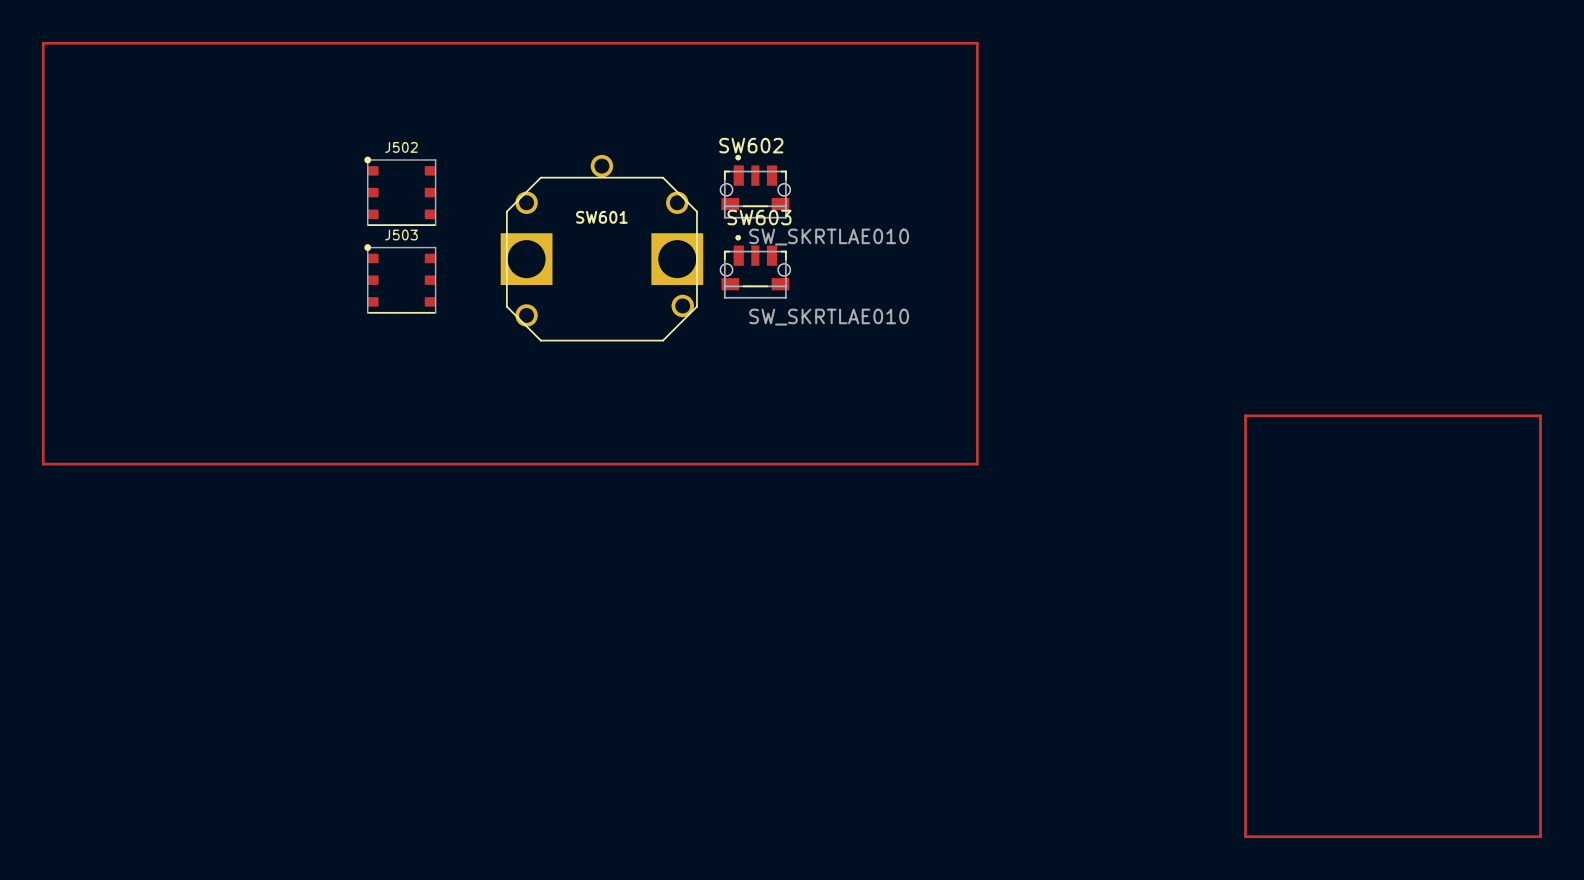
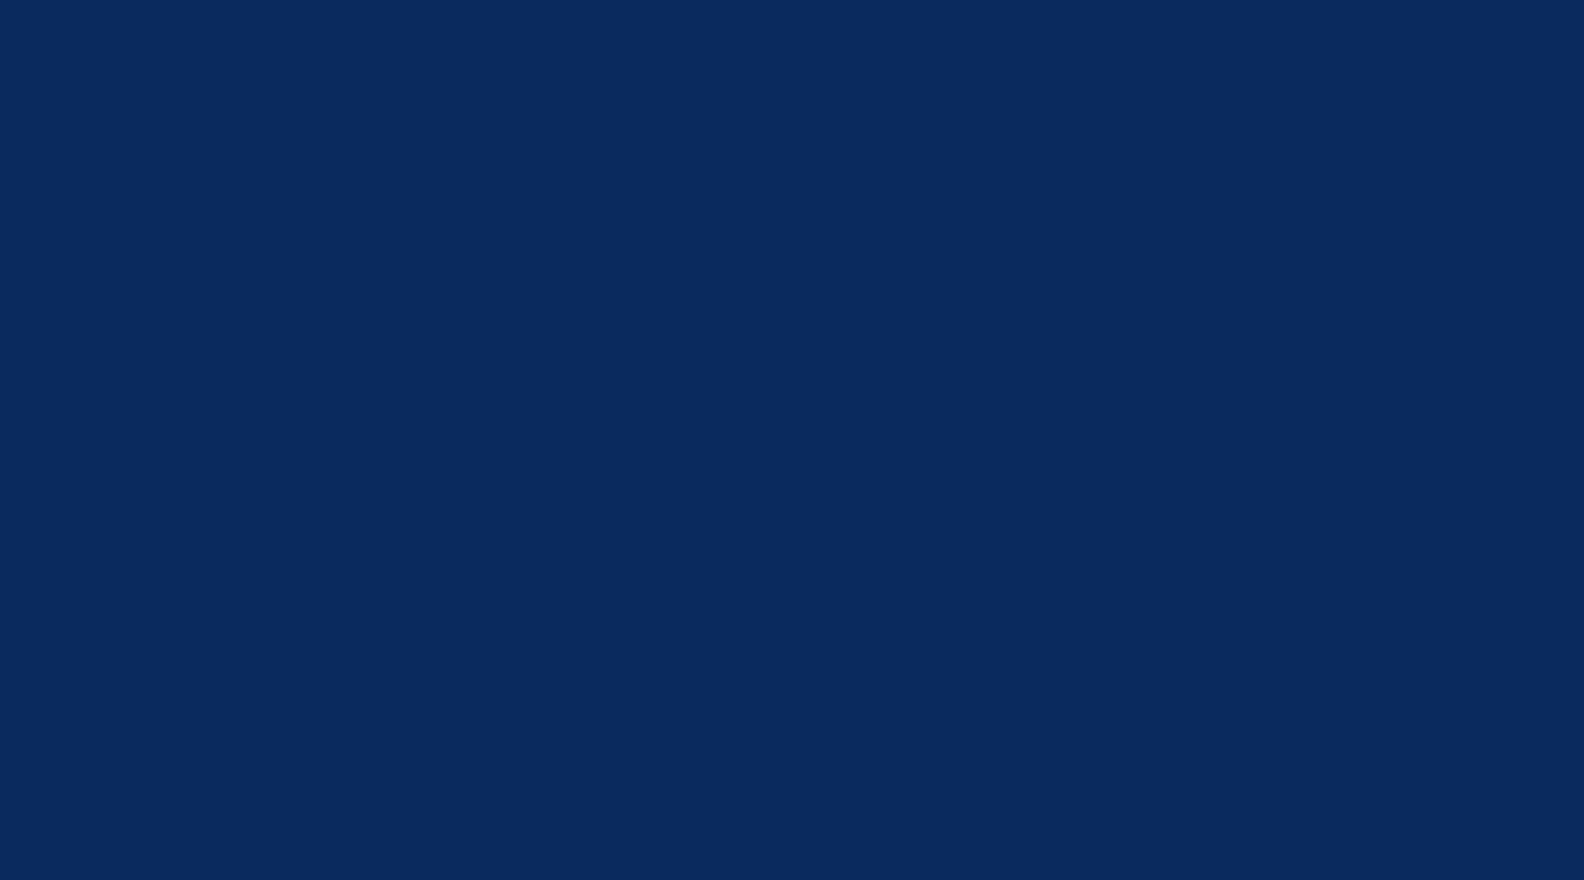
track: (43, 43) (977, 43) (977, 464) (43, 464) (43, 43) -> none
SW602: SW_SKRTLAE010 (755, 186) -> none
J502: (400, 191) -> none
SW601: (601, 248) -> none
SW603: SW_SKRTLAE010 (755, 266) -> none
J503: (400, 278) -> none
track: (1245, 415) (1540, 415) (1540, 836) (1245, 836) (1245, 415) -> none

